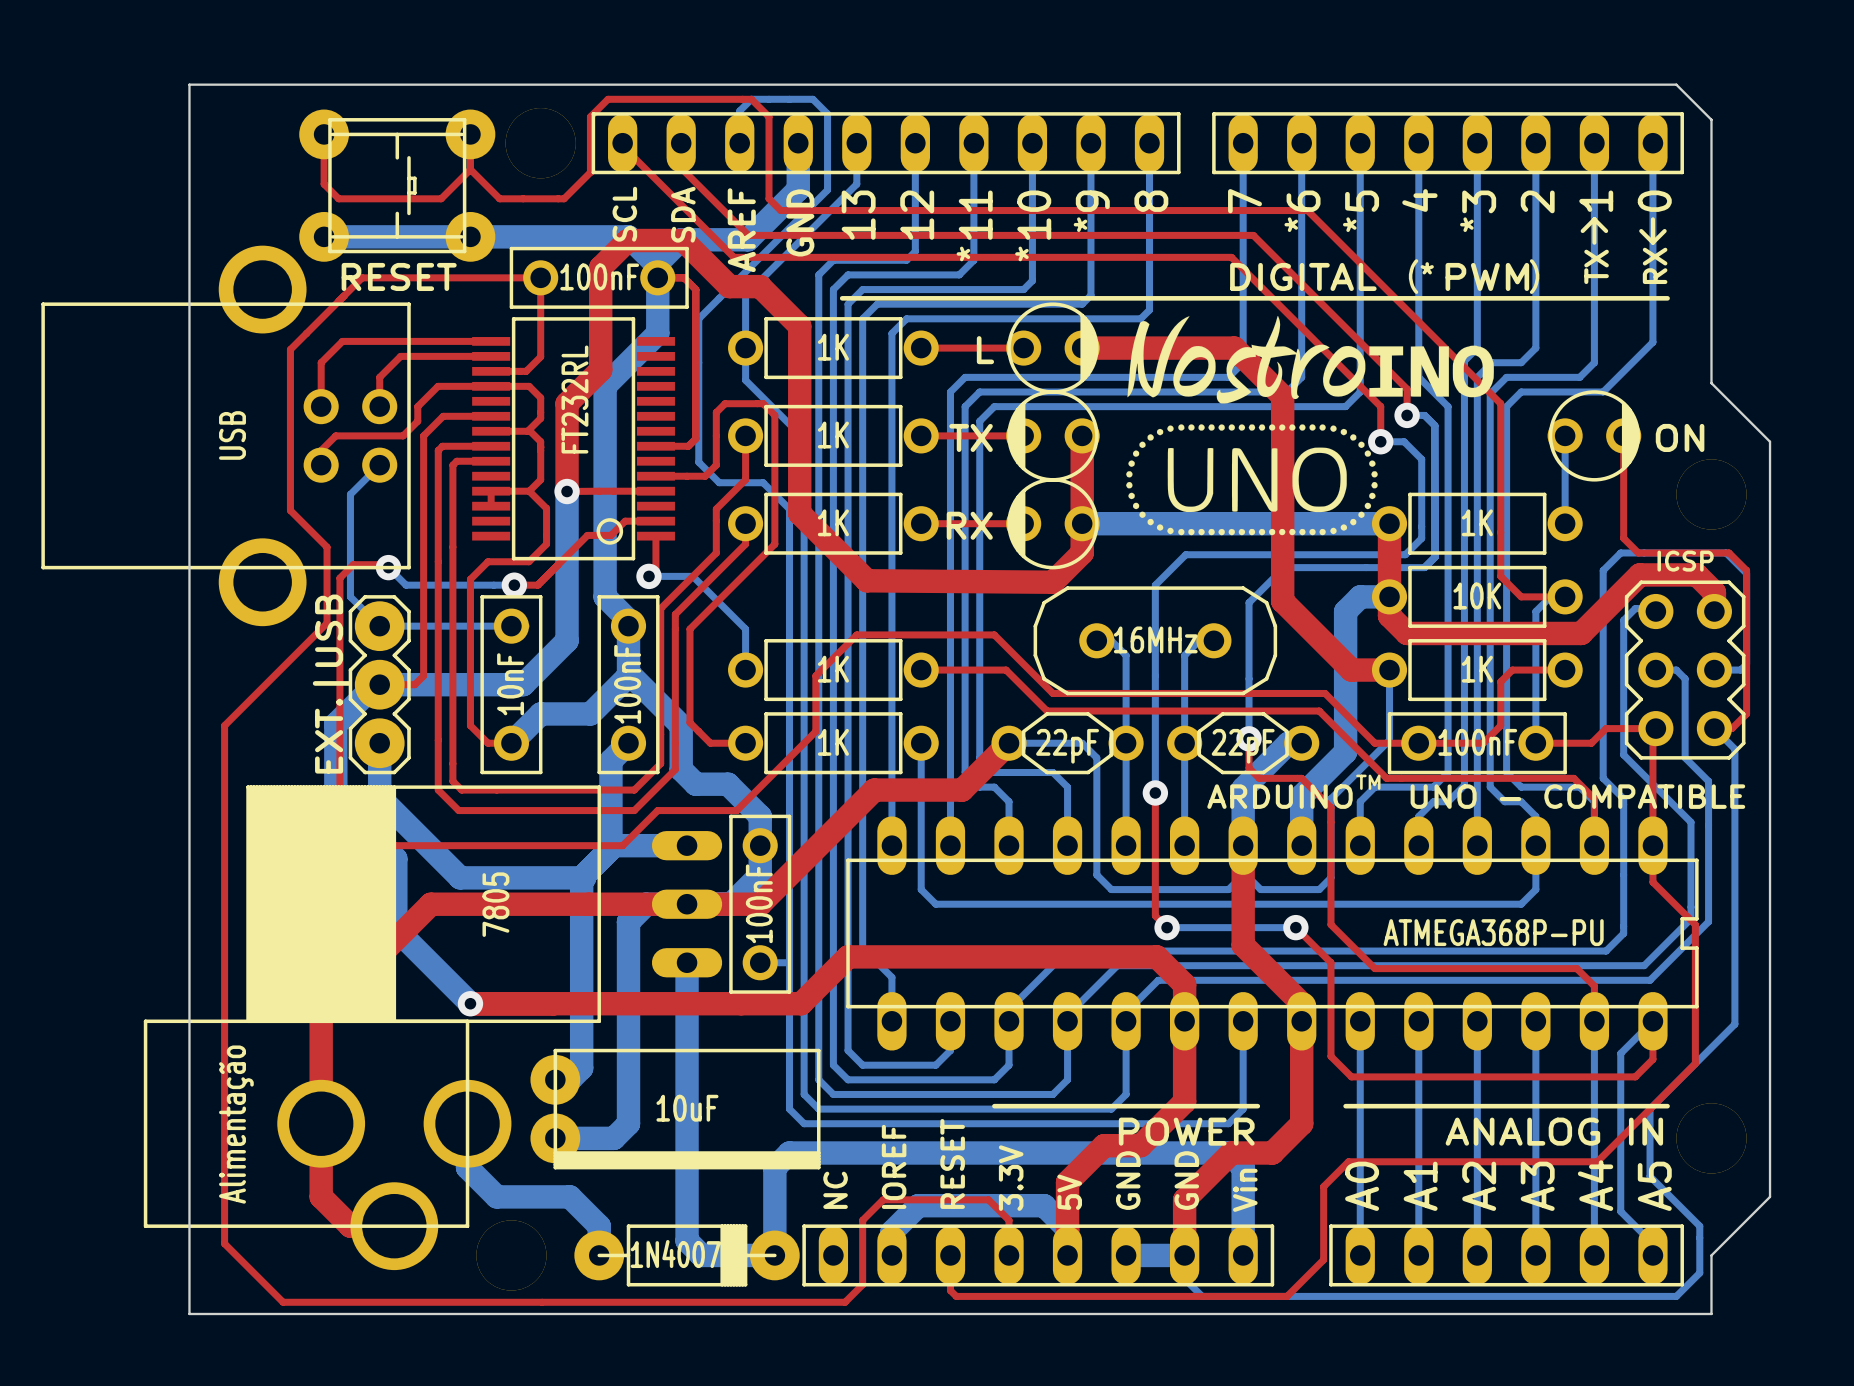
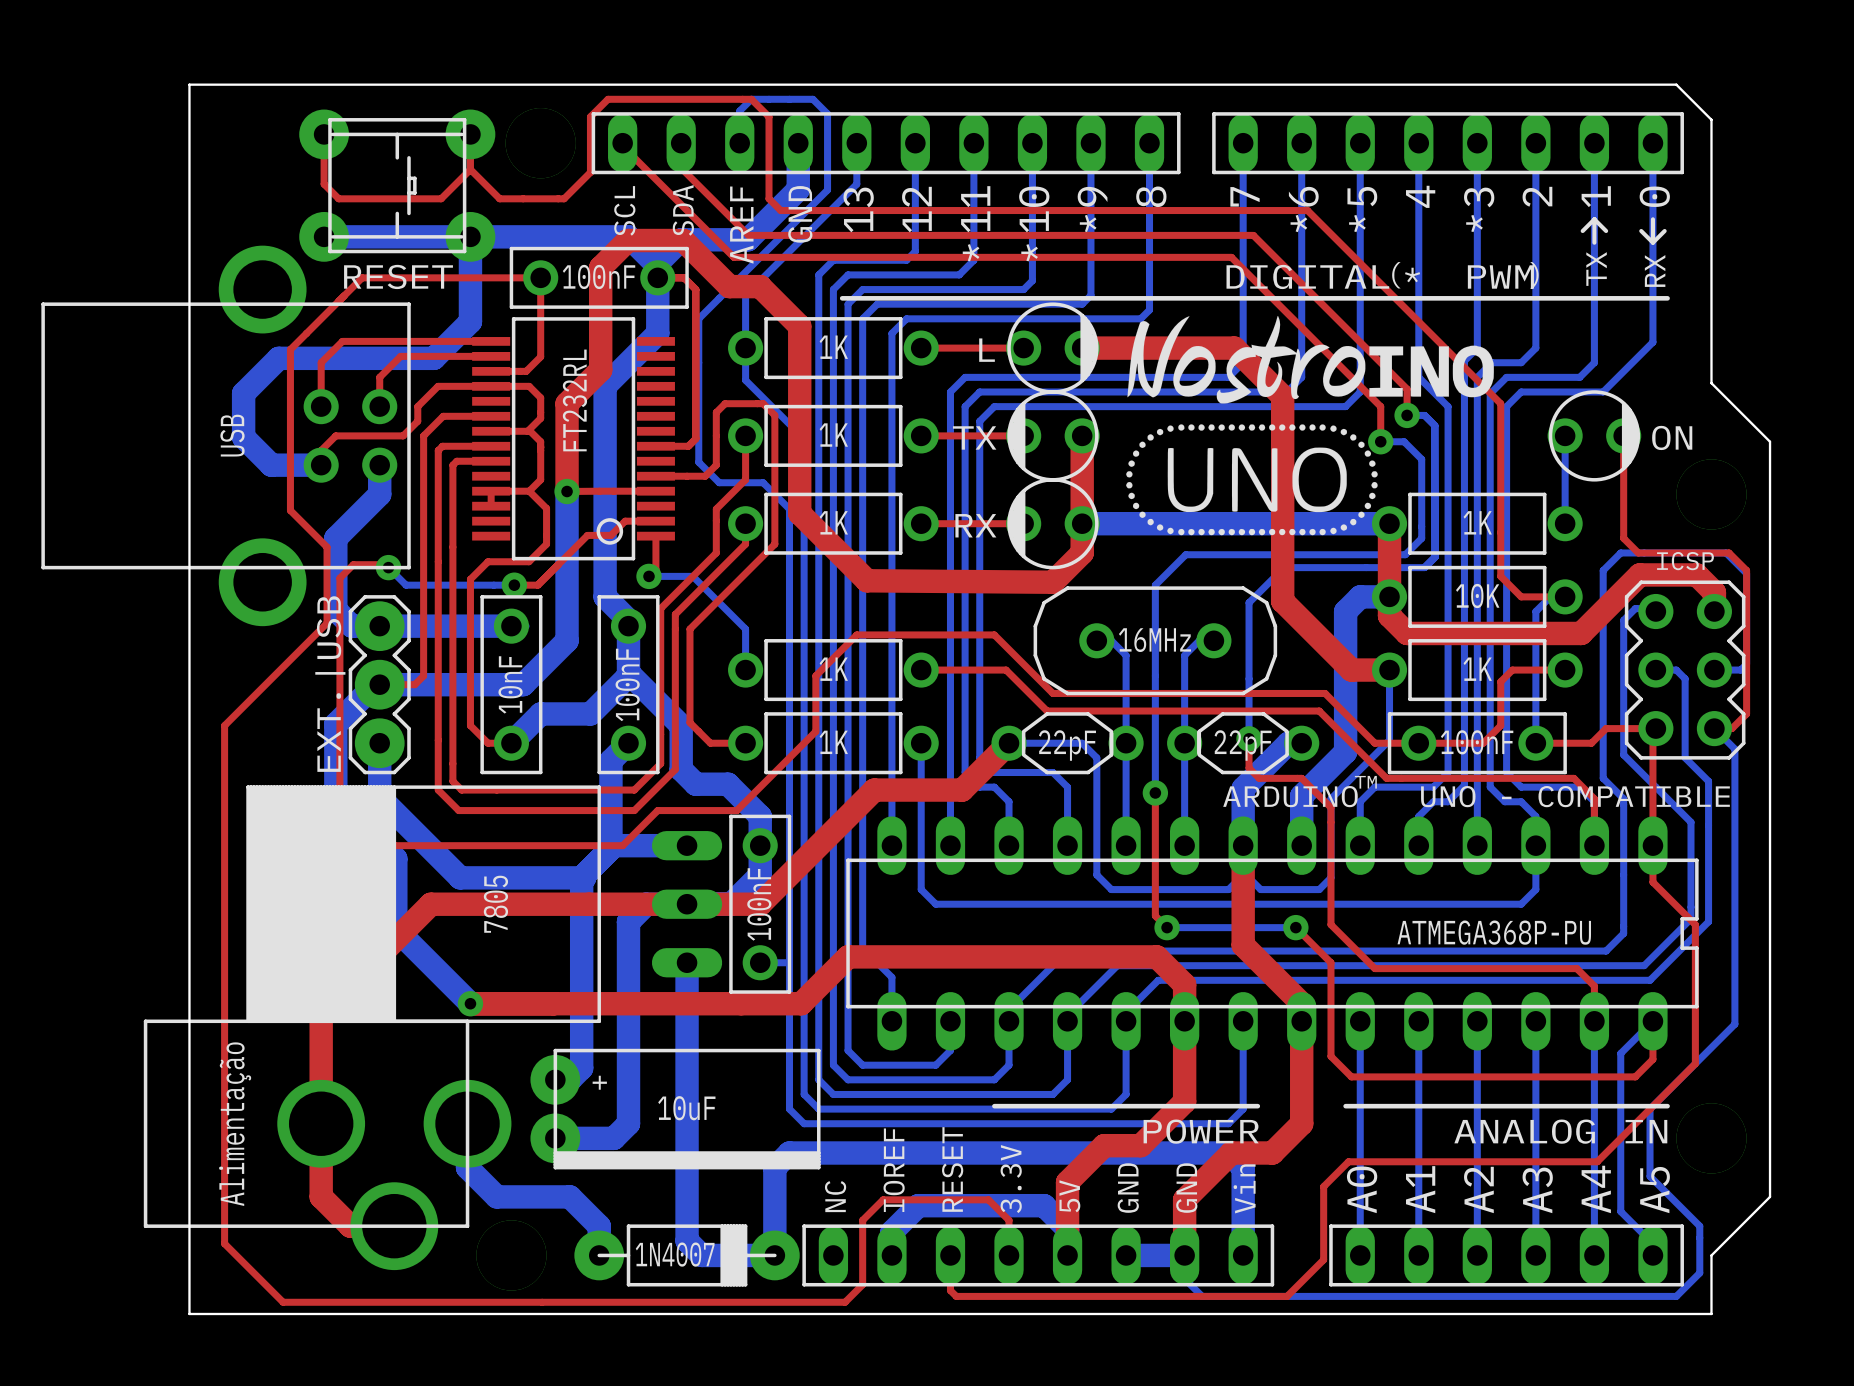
bottom track: none -> (470, 236) (470, 321) (433, 358) (278, 358) (243, 393) (243, 437) (271, 465) (321, 465)
bottom track: (379, 465) (350, 494) (350, 596) (379, 626) -> (379, 465) (379, 494) (335, 538) (335, 610) (351, 626) (511, 626)
text: none -> + (599, 1082)

